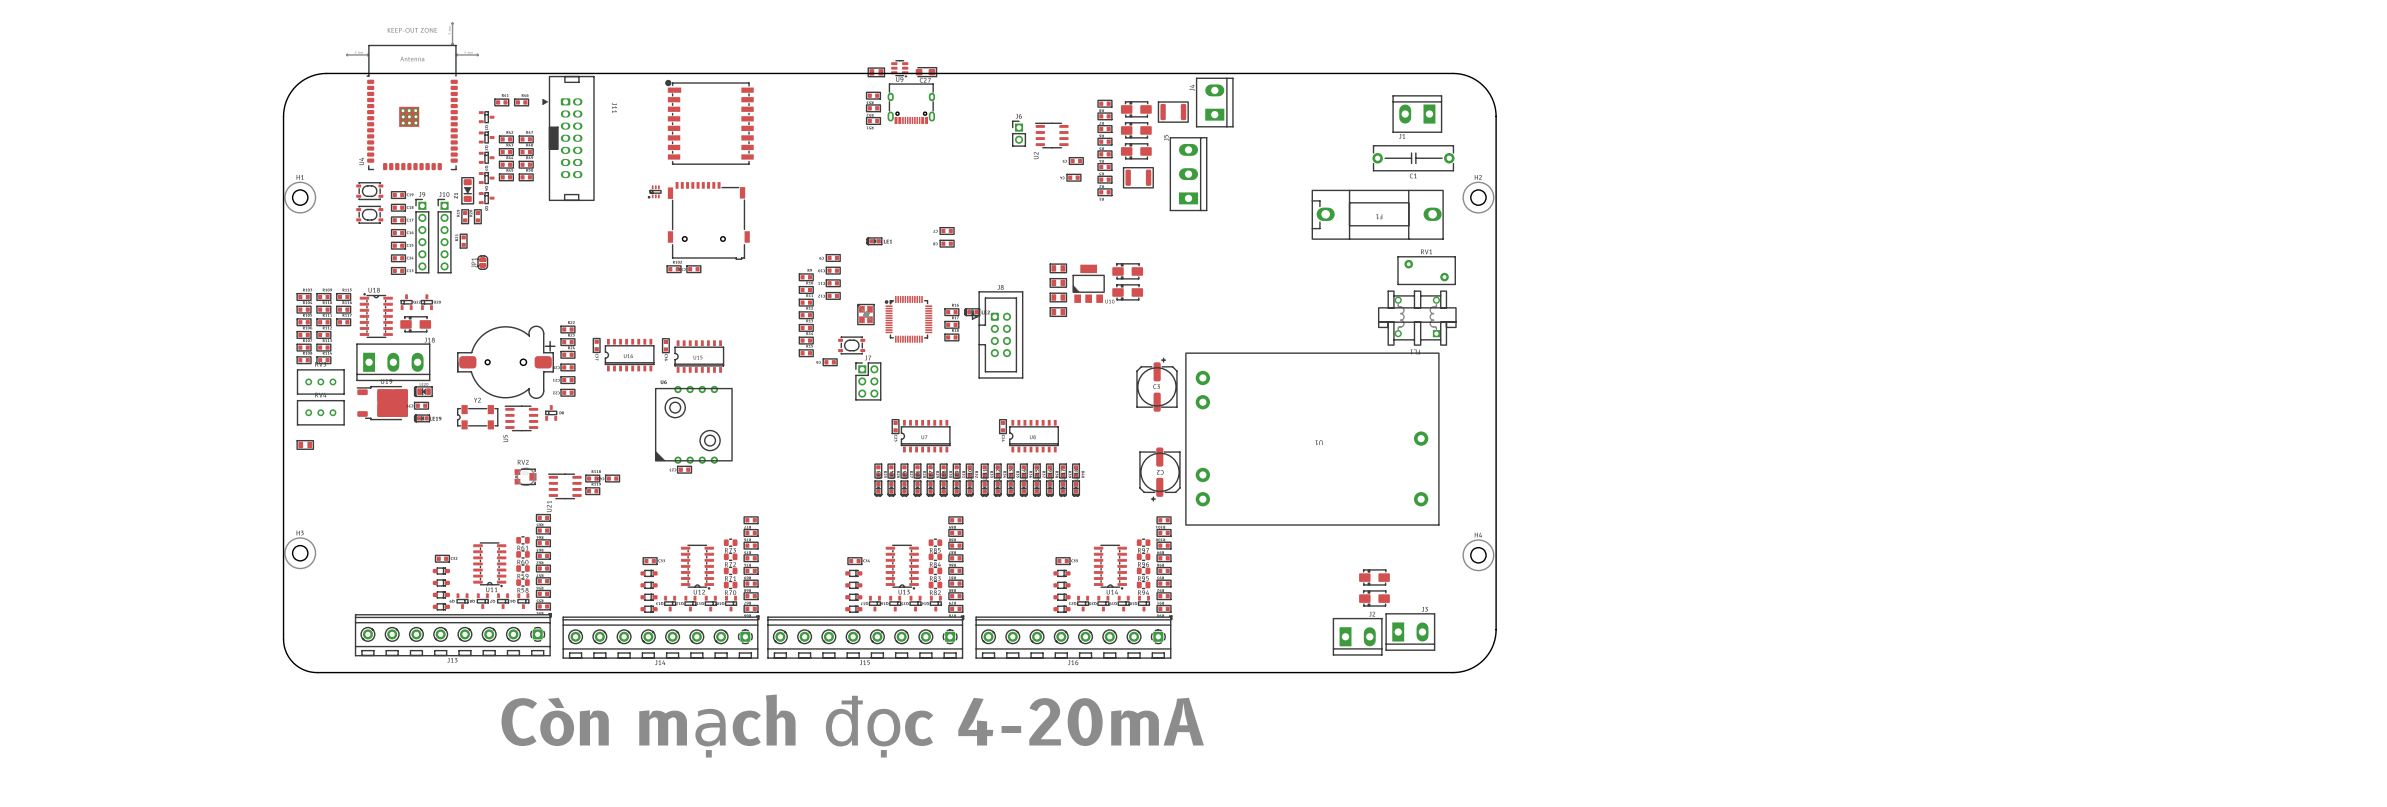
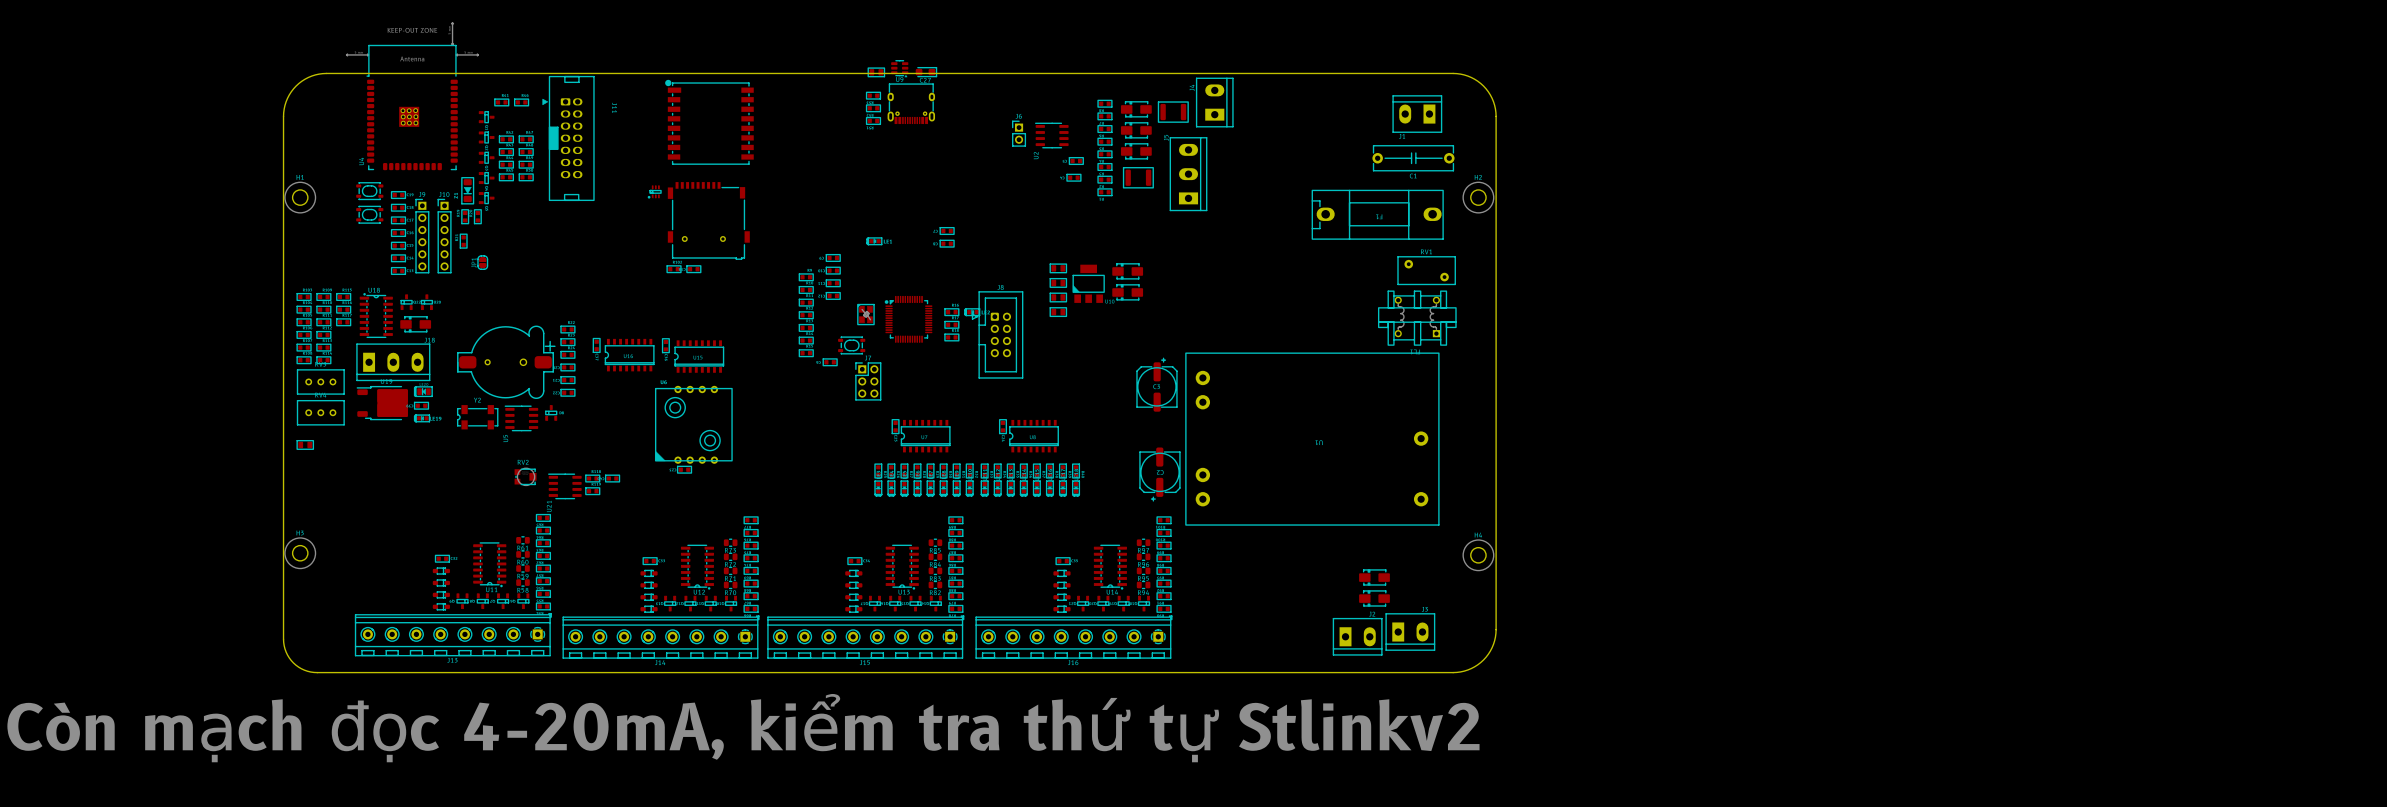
text: Còn mạch đọc 4-20mA (852, 726) -> none
text: none -> Còn mạch đọc 4-20mA, kiểm tra thứ tự Stlinkv2 (743, 728)

